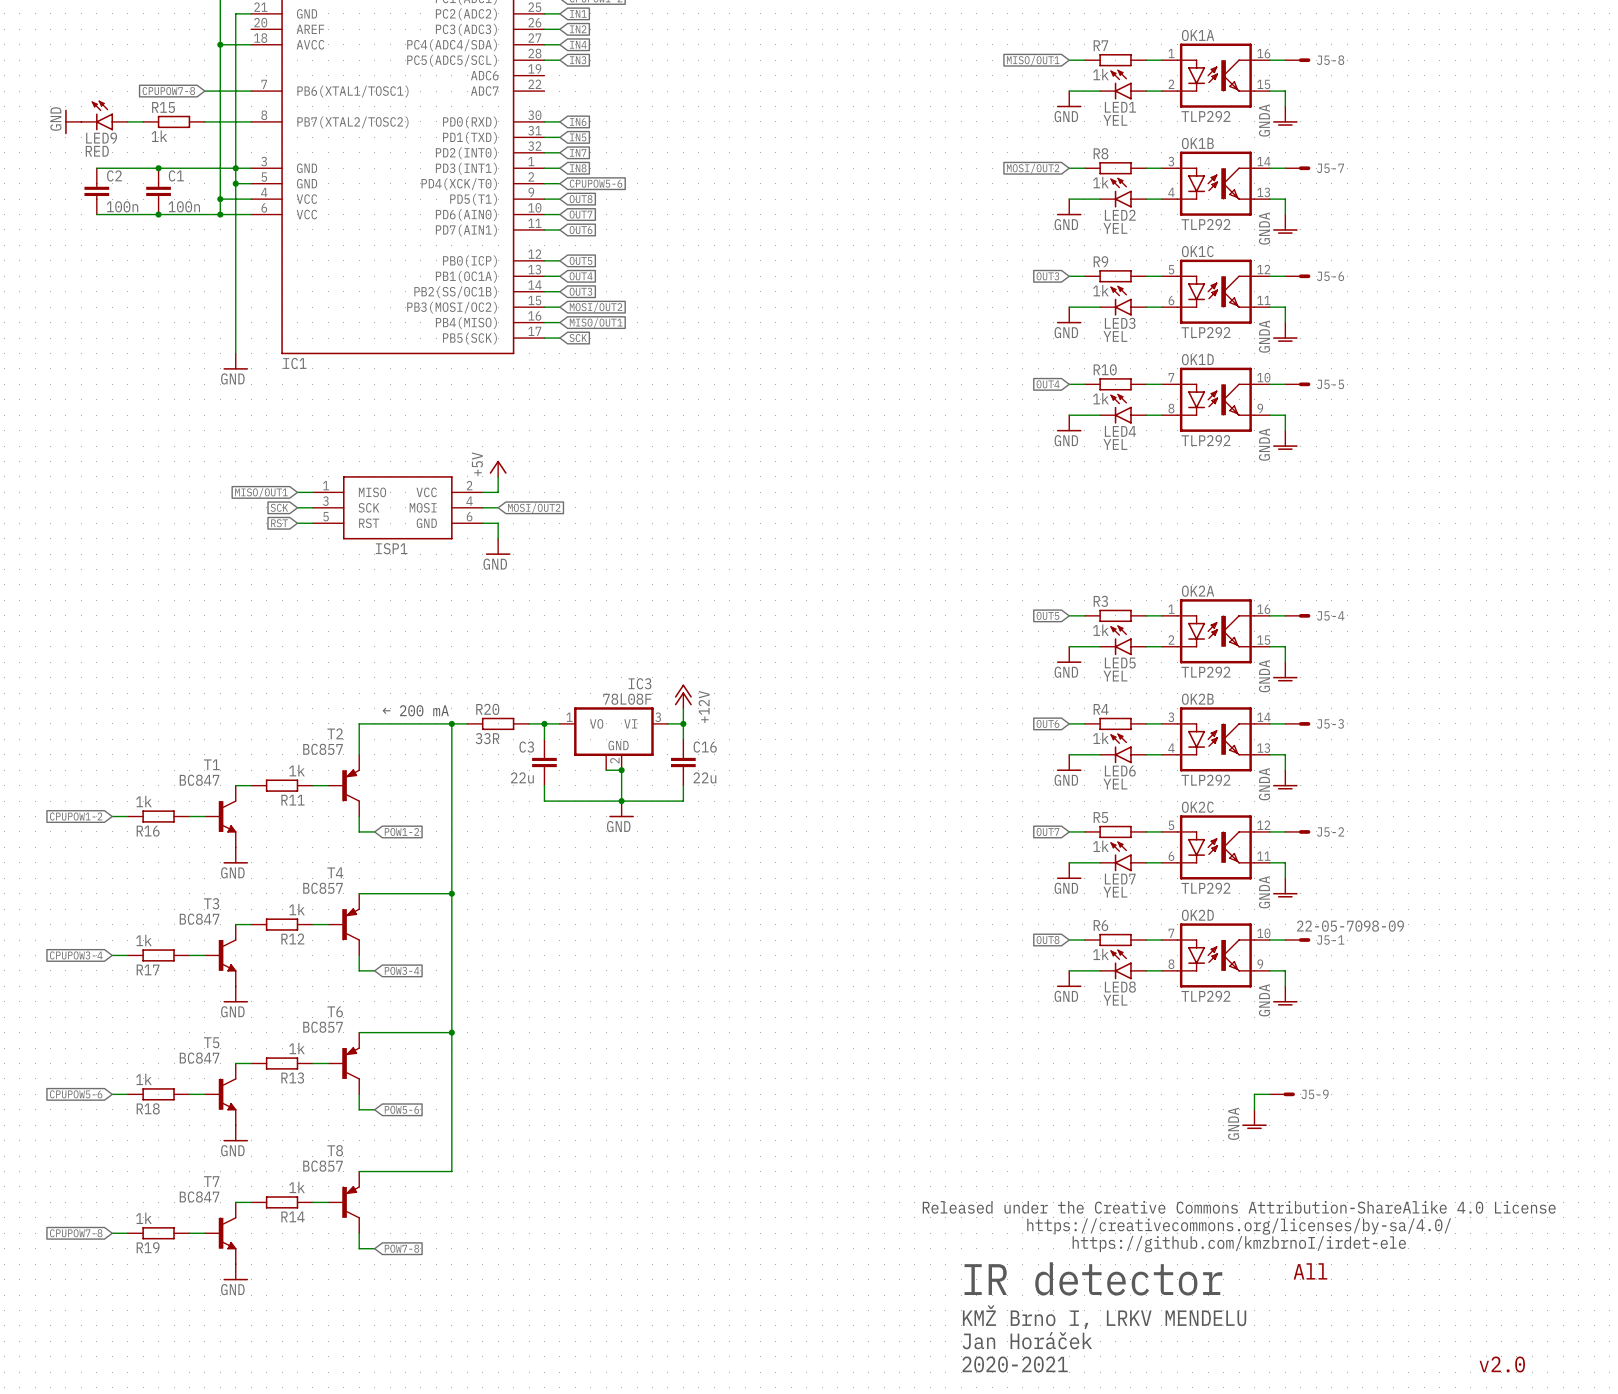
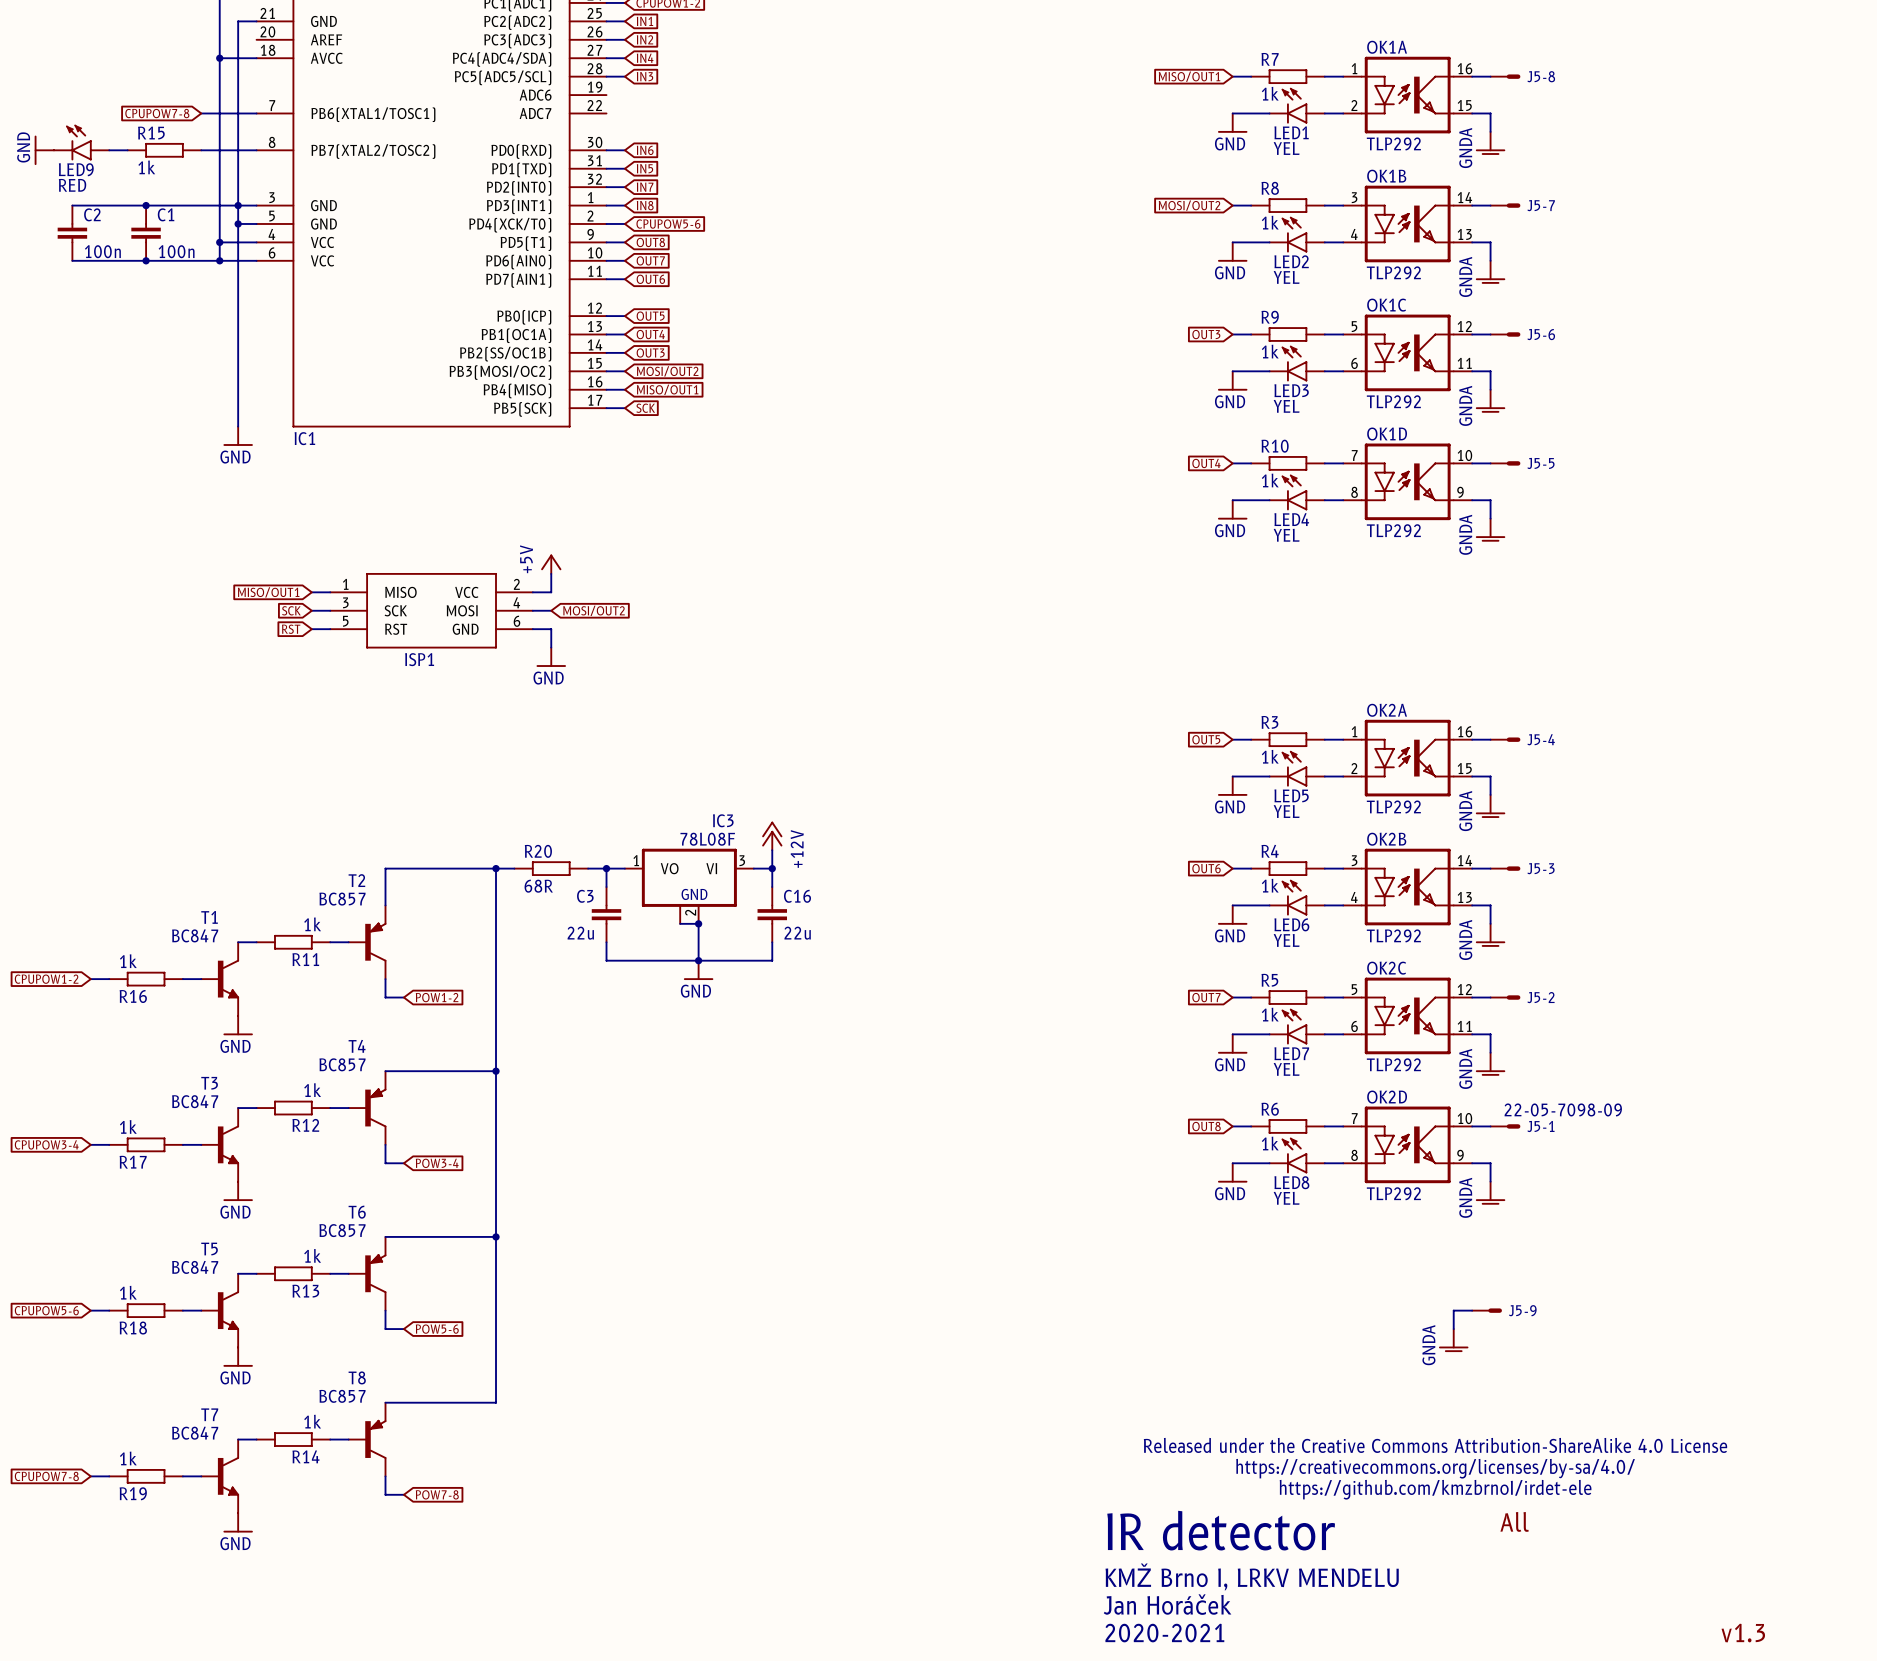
text: ← 200 mA (415, 710) -> none
R20 value: 33R (487, 738) -> 68R (538, 886)
text: v2.0 (1502, 1364) -> v1.3 (1743, 1633)

